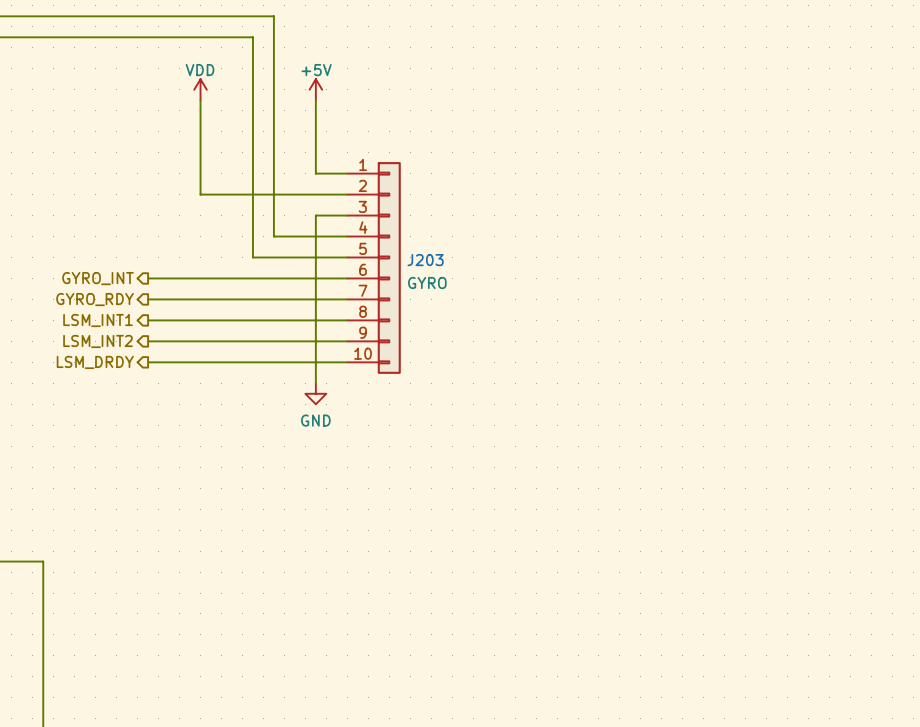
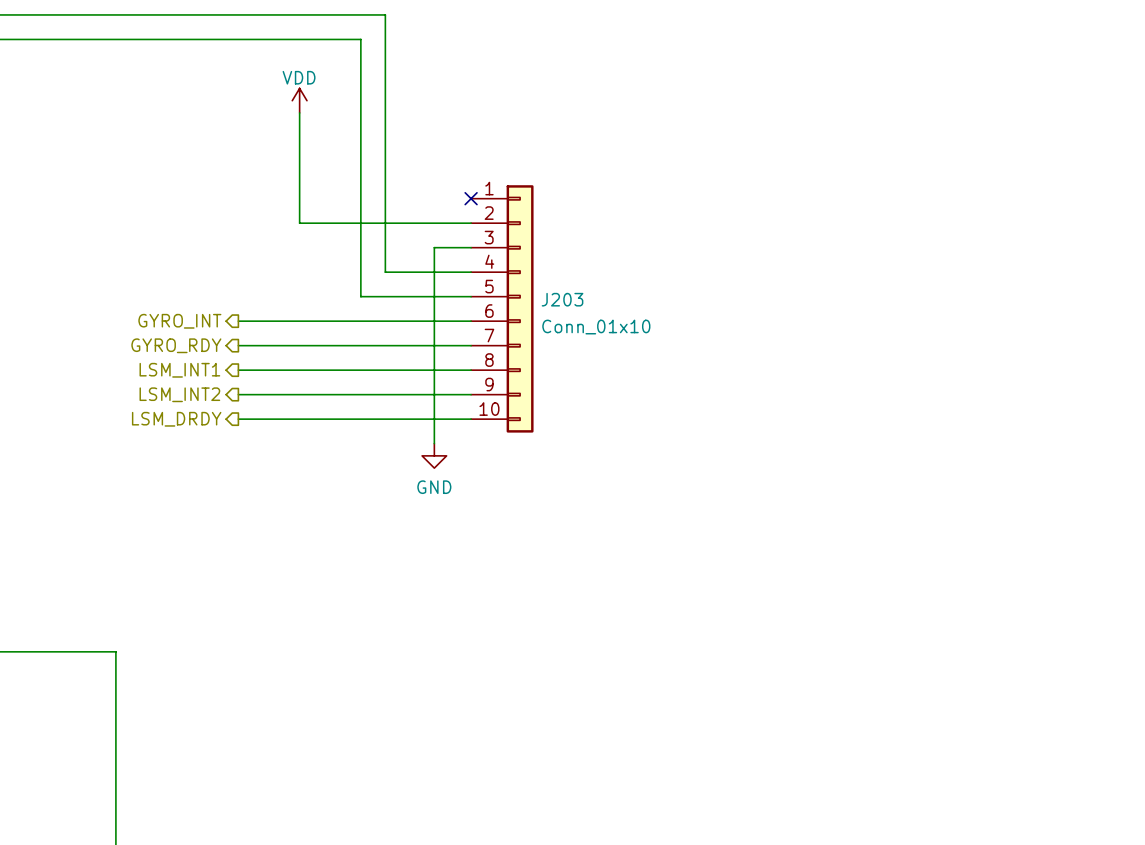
power symbol: +5V (315, 89) -> none
wire: (315, 100) (315, 173) (347, 173) -> none
no-connect mark: none -> (471, 198)
J203 value: GYRO (427, 282) -> Conn_01x10 (596, 327)

